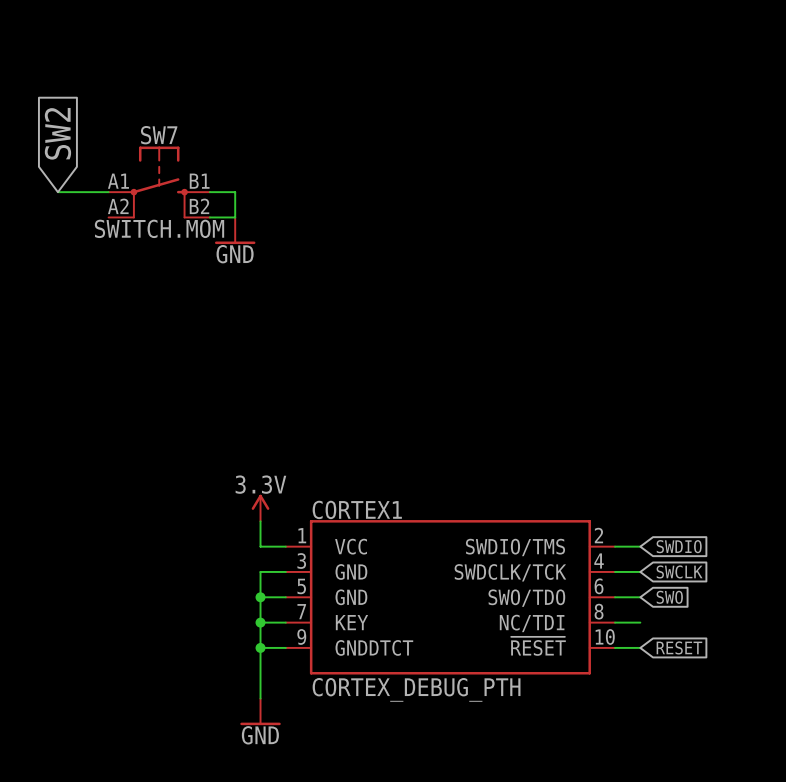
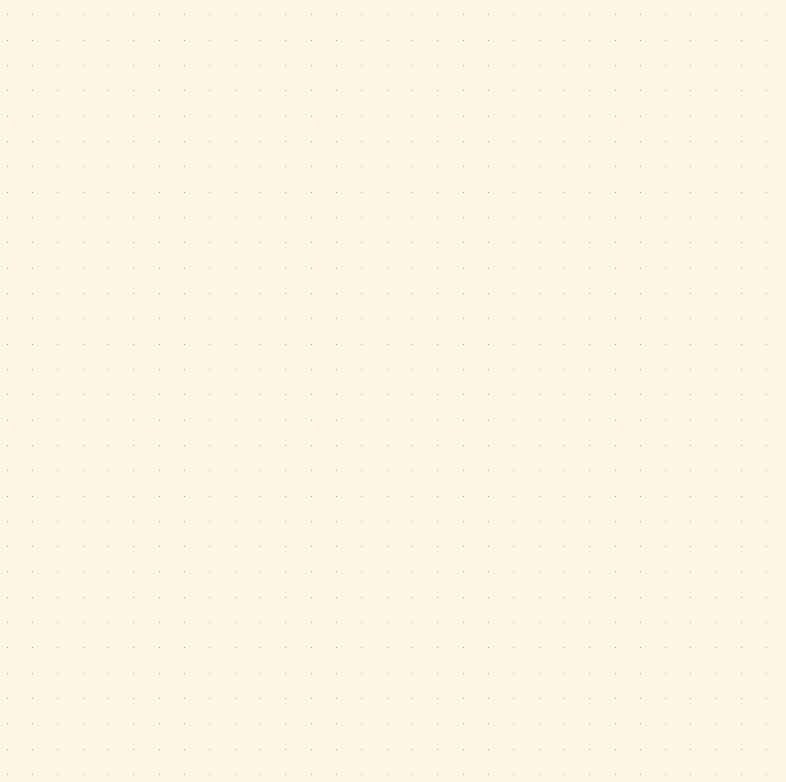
global label: SW2 (57, 133) -> none
SW7: SWITCH.MOM (159, 182) -> none
wire: (57, 192) (108, 192) -> none
wire: (209, 192) (235, 192) (235, 217) (209, 217) -> none
power symbol: GND (235, 230) -> none
power symbol: 3.3V (260, 508) -> none
wire: (260, 521) (260, 546) (285, 546) -> none
wire: (615, 546) (640, 546) -> none
global label: SWDIO (679, 546) -> none
wire: (285, 571) (260, 571) (260, 698) -> none
wire: (615, 571) (640, 571) -> none
global label: SWCLK (679, 571) -> none
wire: (260, 597) (285, 597) -> none
junction: (260, 597) -> none
CORTEX1: CORTEX_DEBUG_PTH (450, 597) -> none
wire: (615, 597) (640, 597) -> none
global label: SWO (669, 597) -> none
wire: (260, 622) (285, 622) -> none
junction: (260, 622) -> none
wire: (615, 622) (640, 622) -> none
wire: (260, 647) (285, 647) -> none
junction: (260, 647) -> none
wire: (615, 647) (640, 647) -> none
global label: RESET (679, 647) -> none
power symbol: GND (260, 711) -> none

